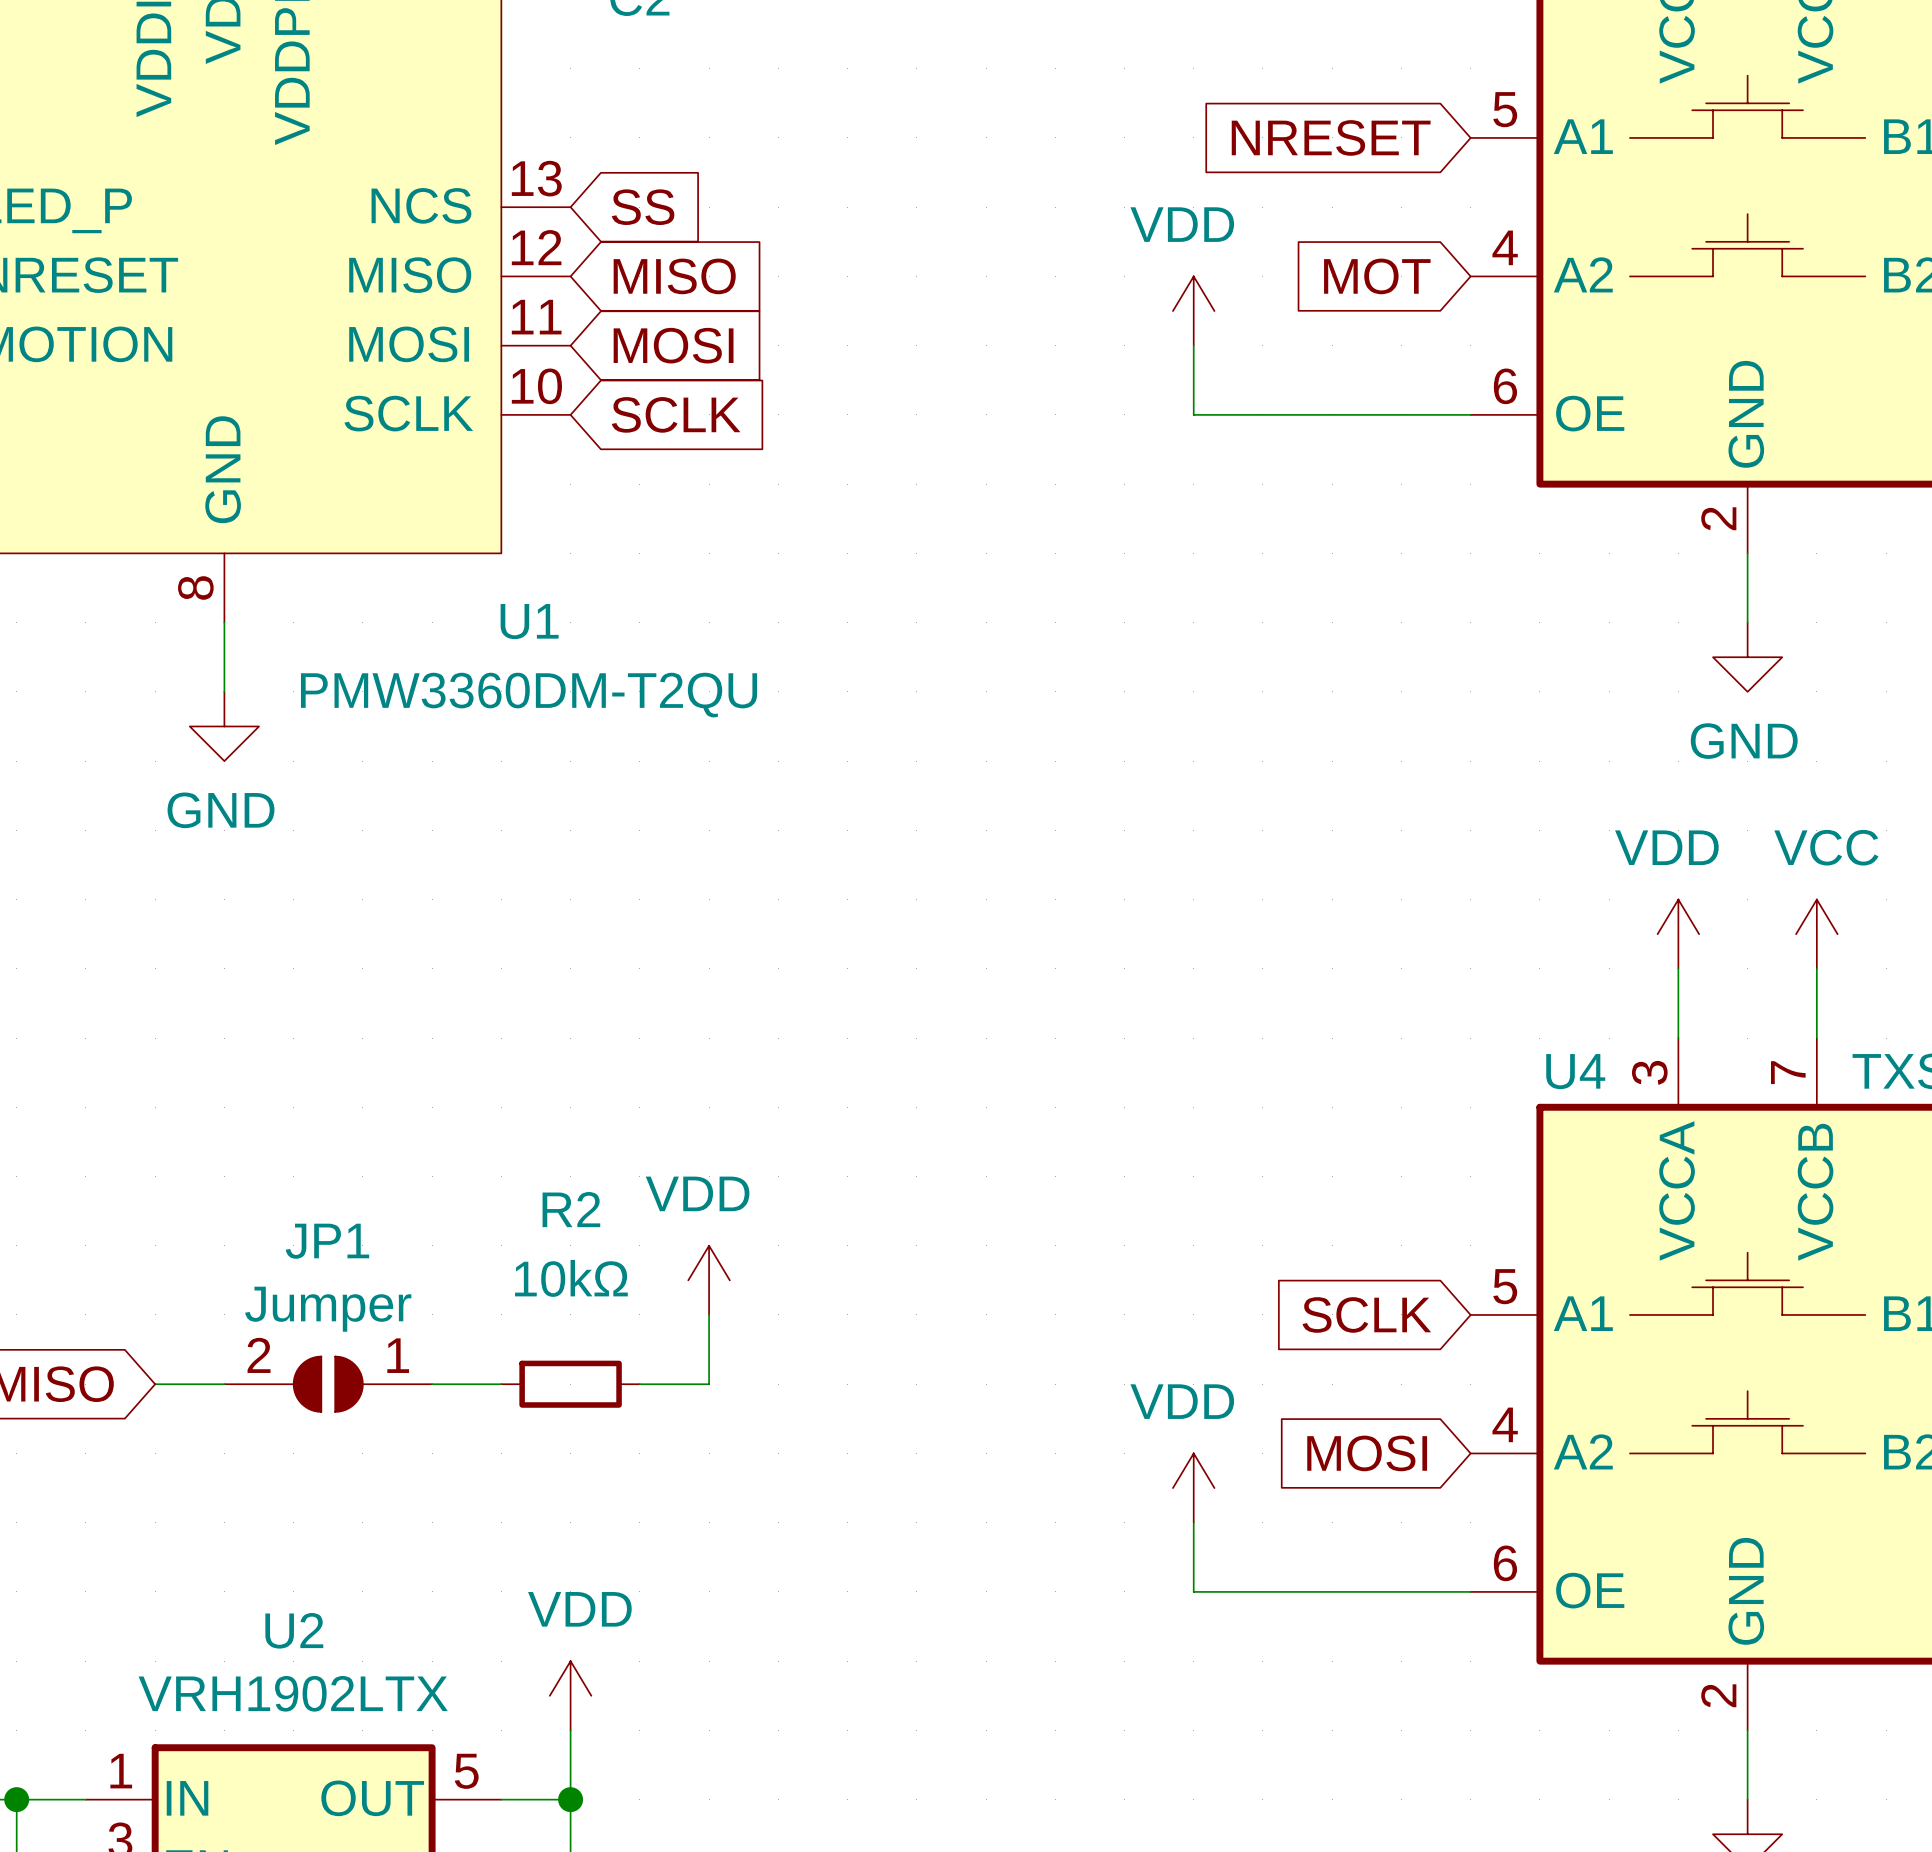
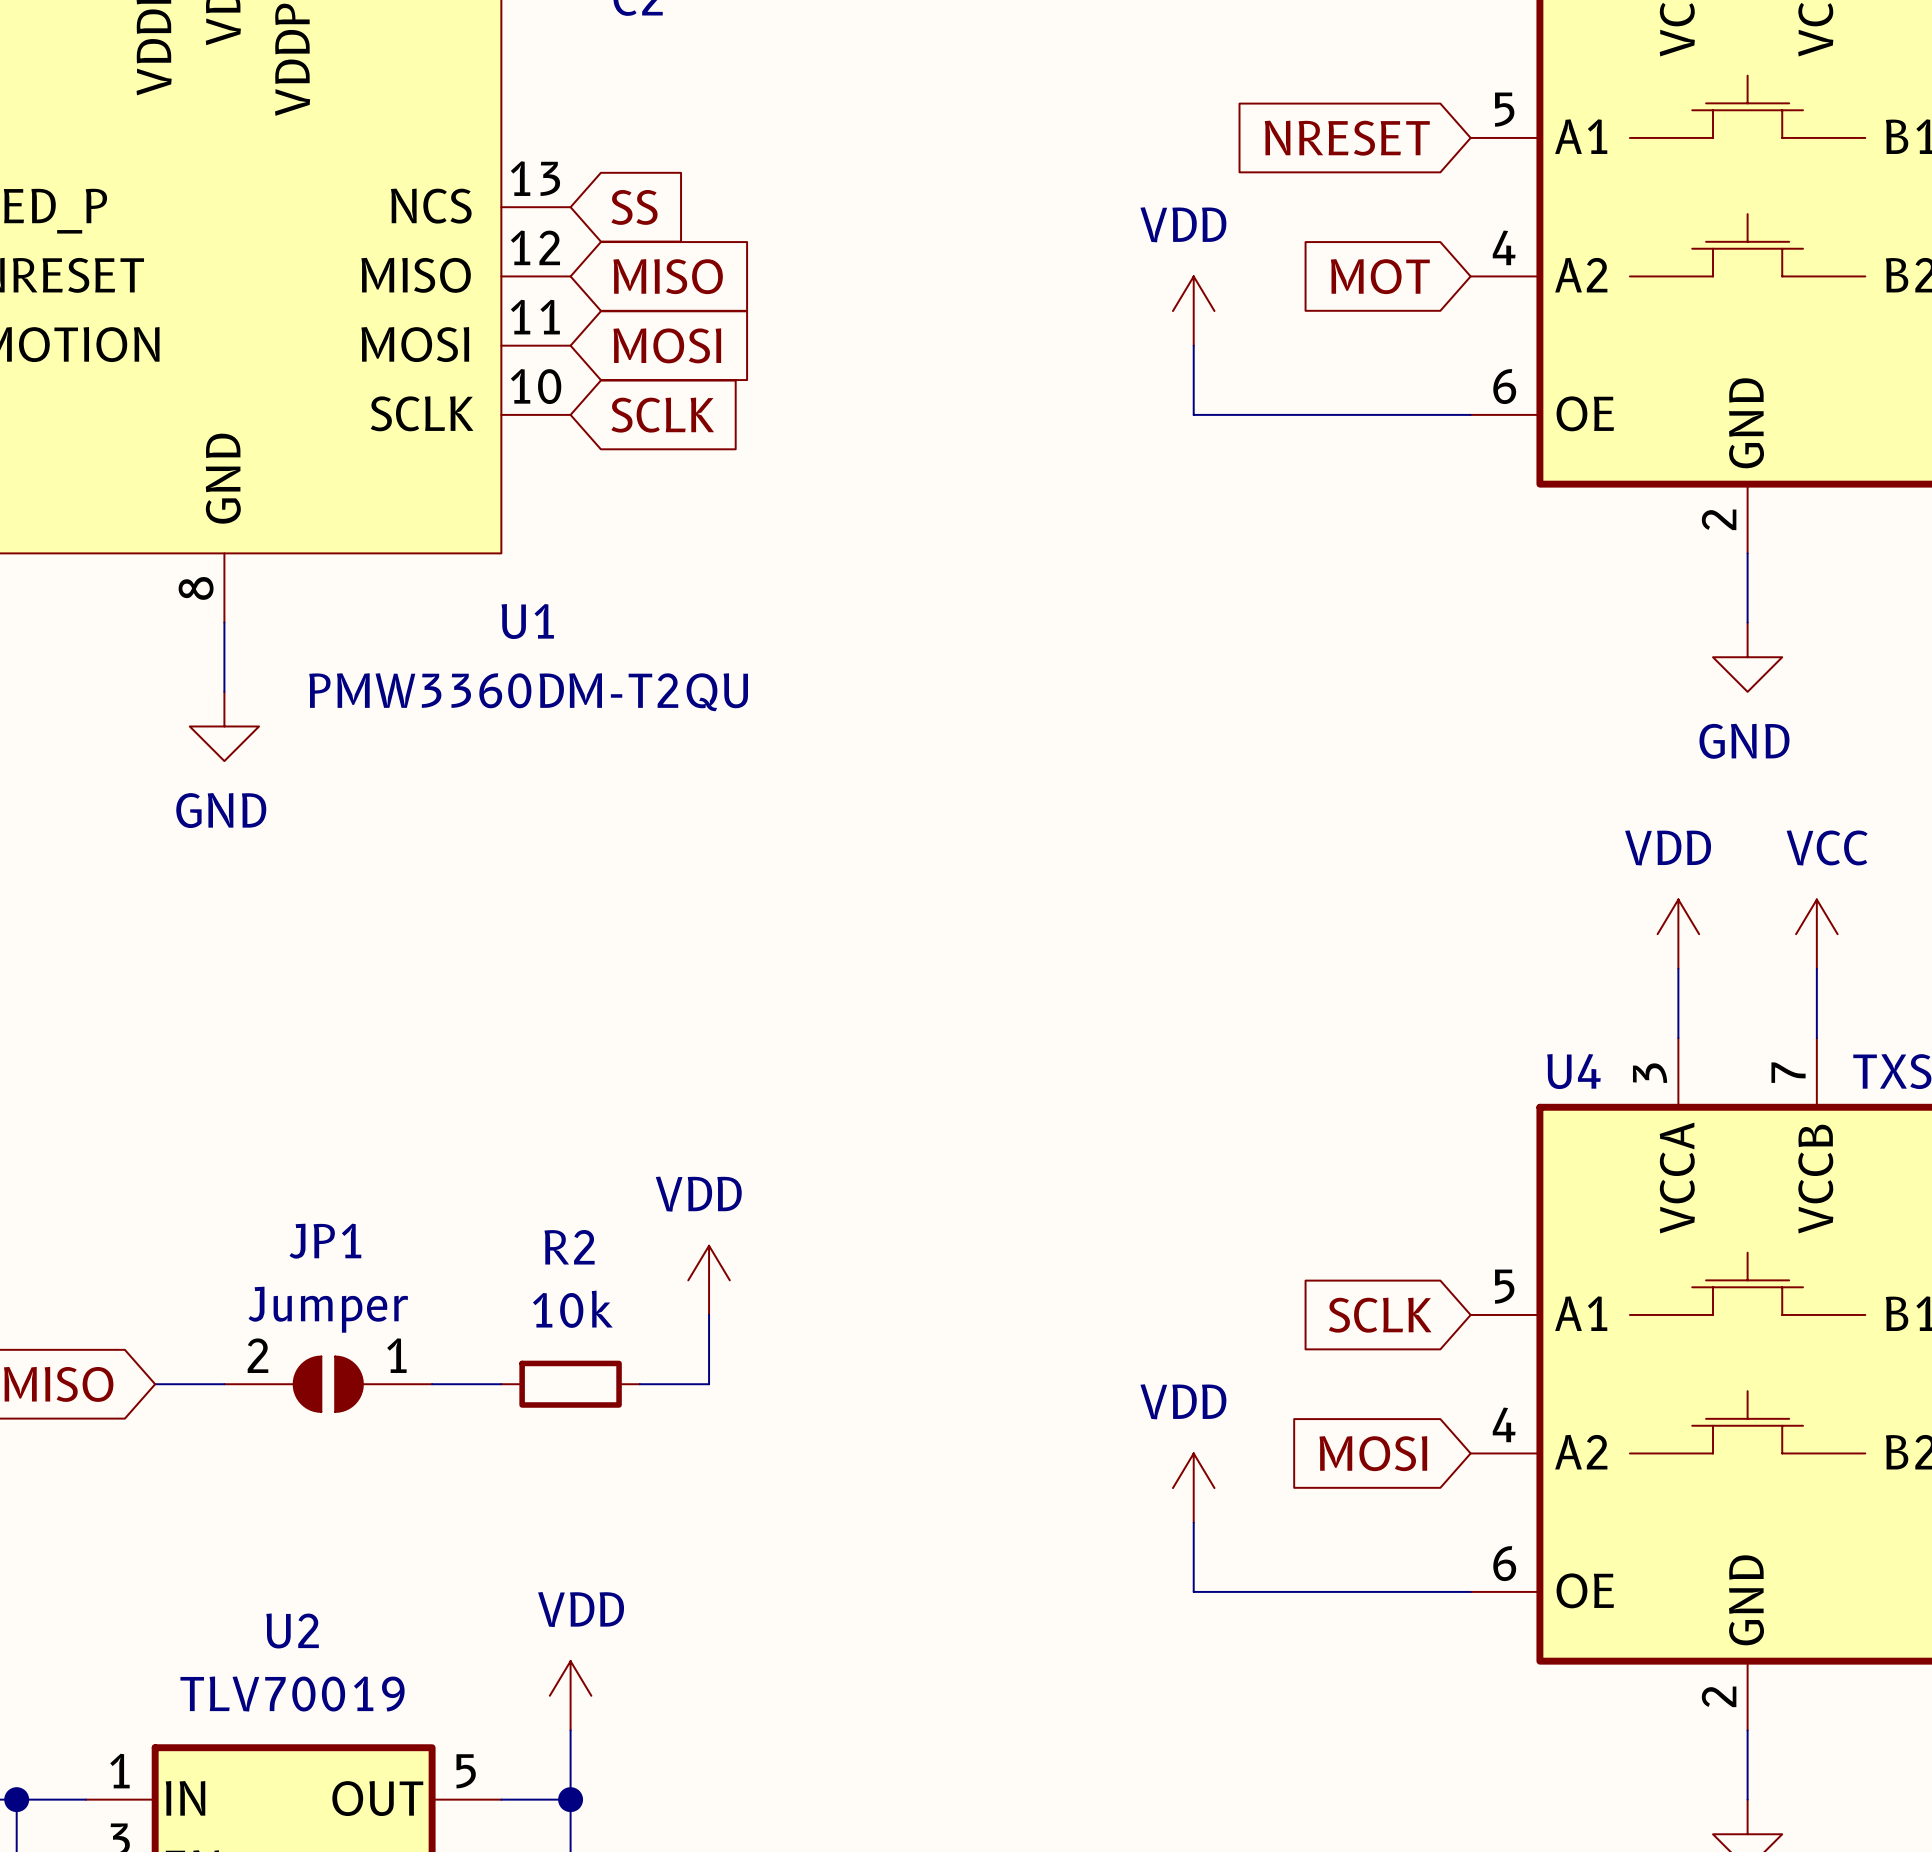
R2 name position: R2 (571, 1209) -> R2 (569, 1247)
R2 value: 10kΩ (571, 1278) -> 10k (572, 1309)
U2 value: VRH1902LTX (293, 1693) -> TLV70019 (292, 1694)

